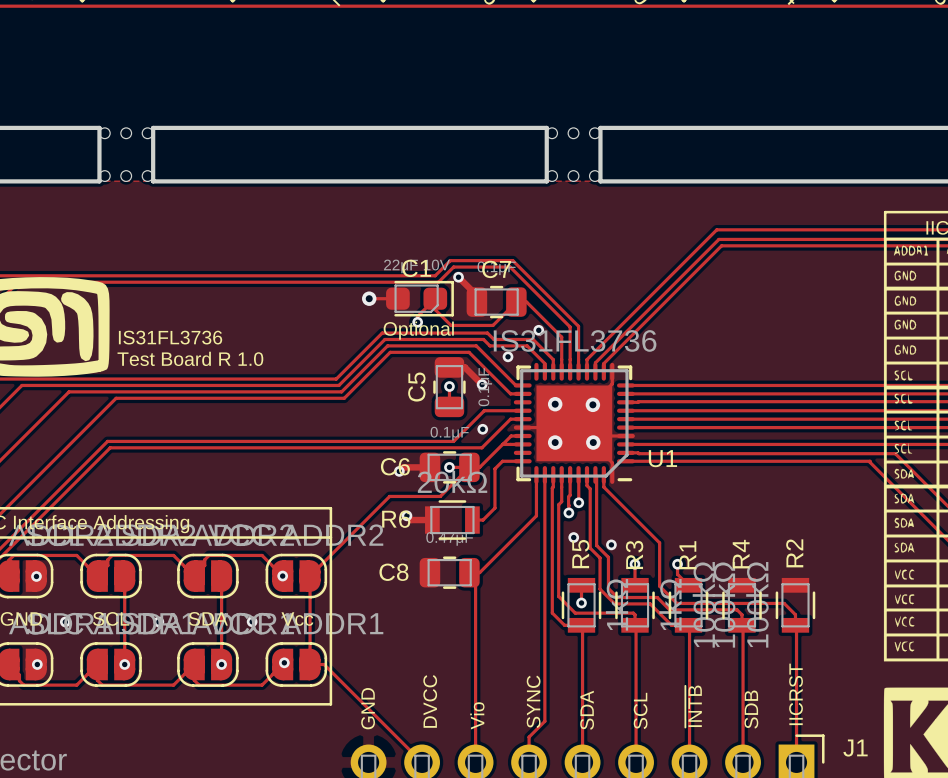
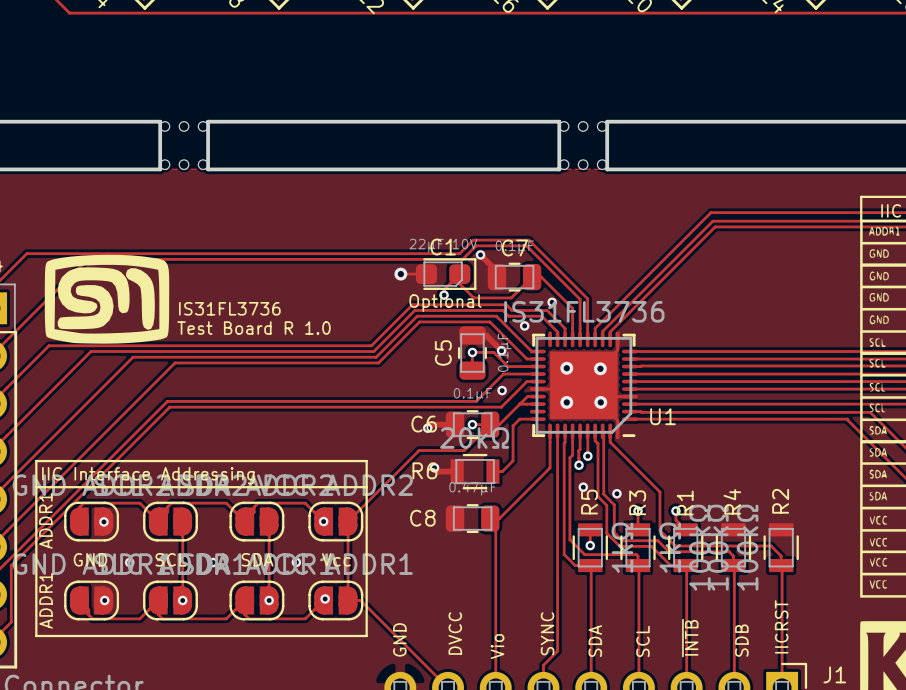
track: none -> (472, 352) (493, 352) (507, 366) (537, 366)

